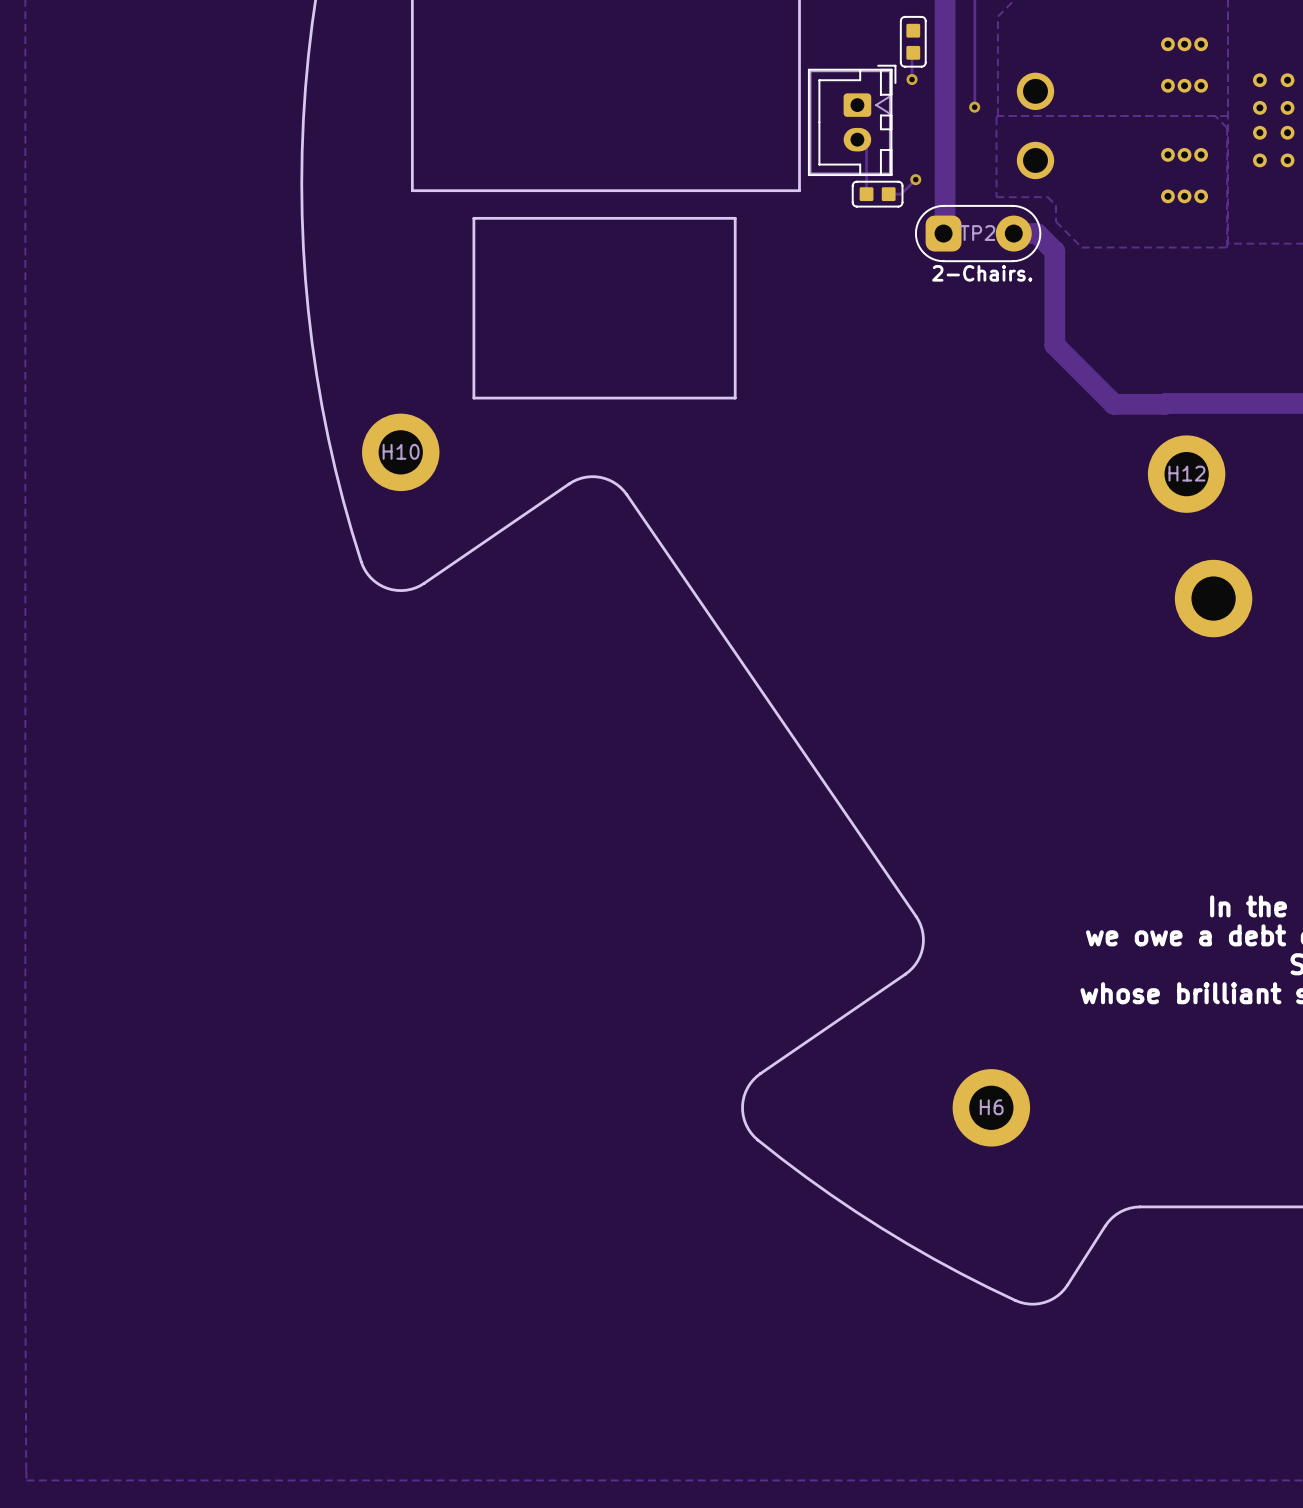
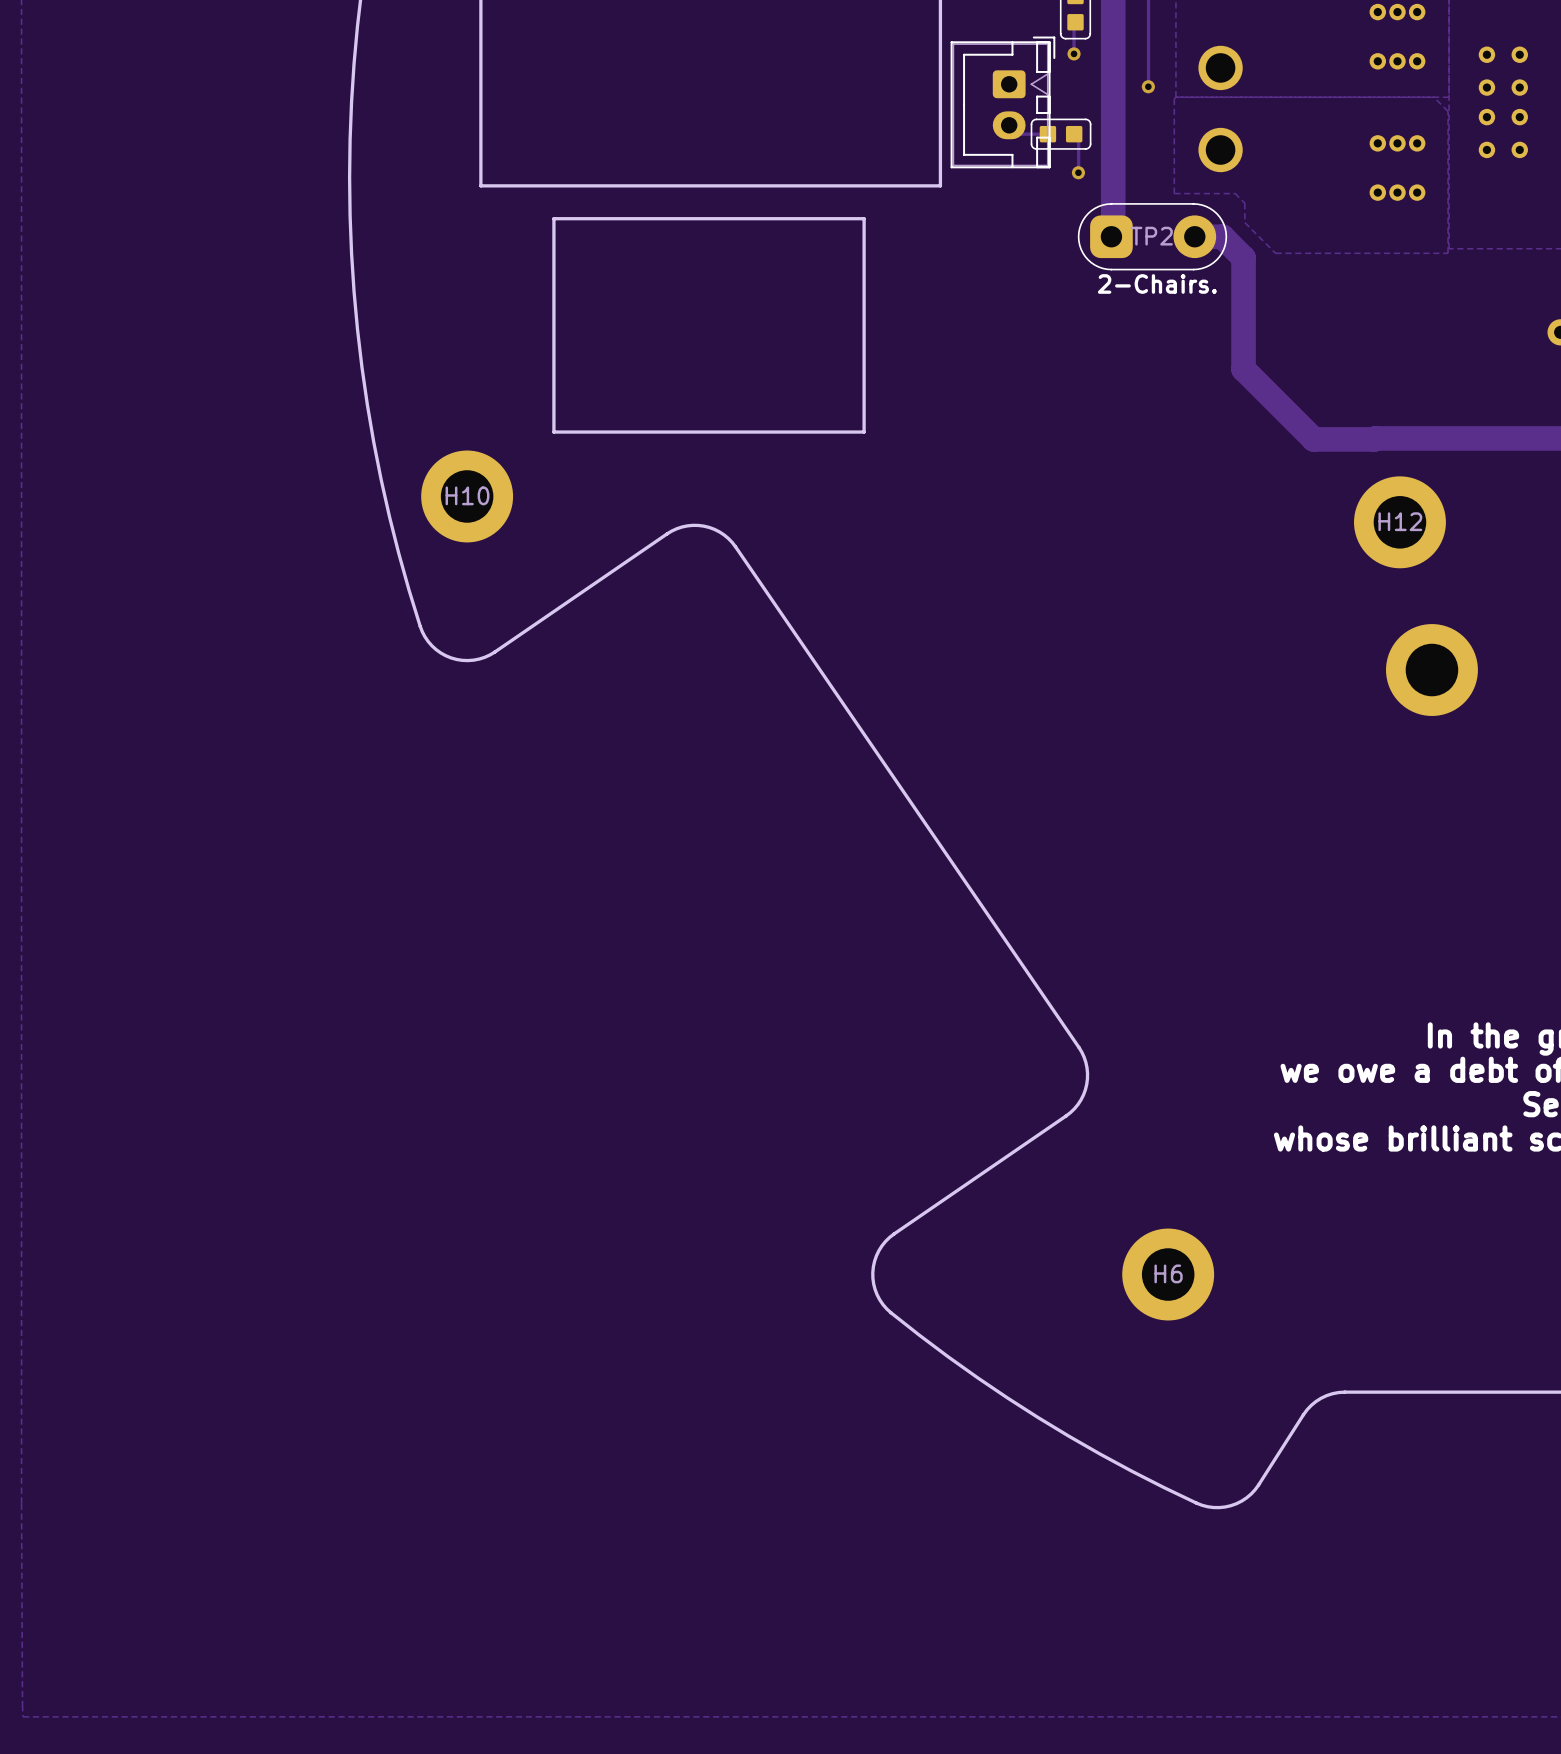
track: (864, 147) (866, 148) (866, 194) -> (1018, 134) (1047, 134)
track: (915, 179) (901, 194) (888, 194) -> (1078, 172) (1078, 138) (1074, 134)
part position: (877, 194) -> (1061, 134)

